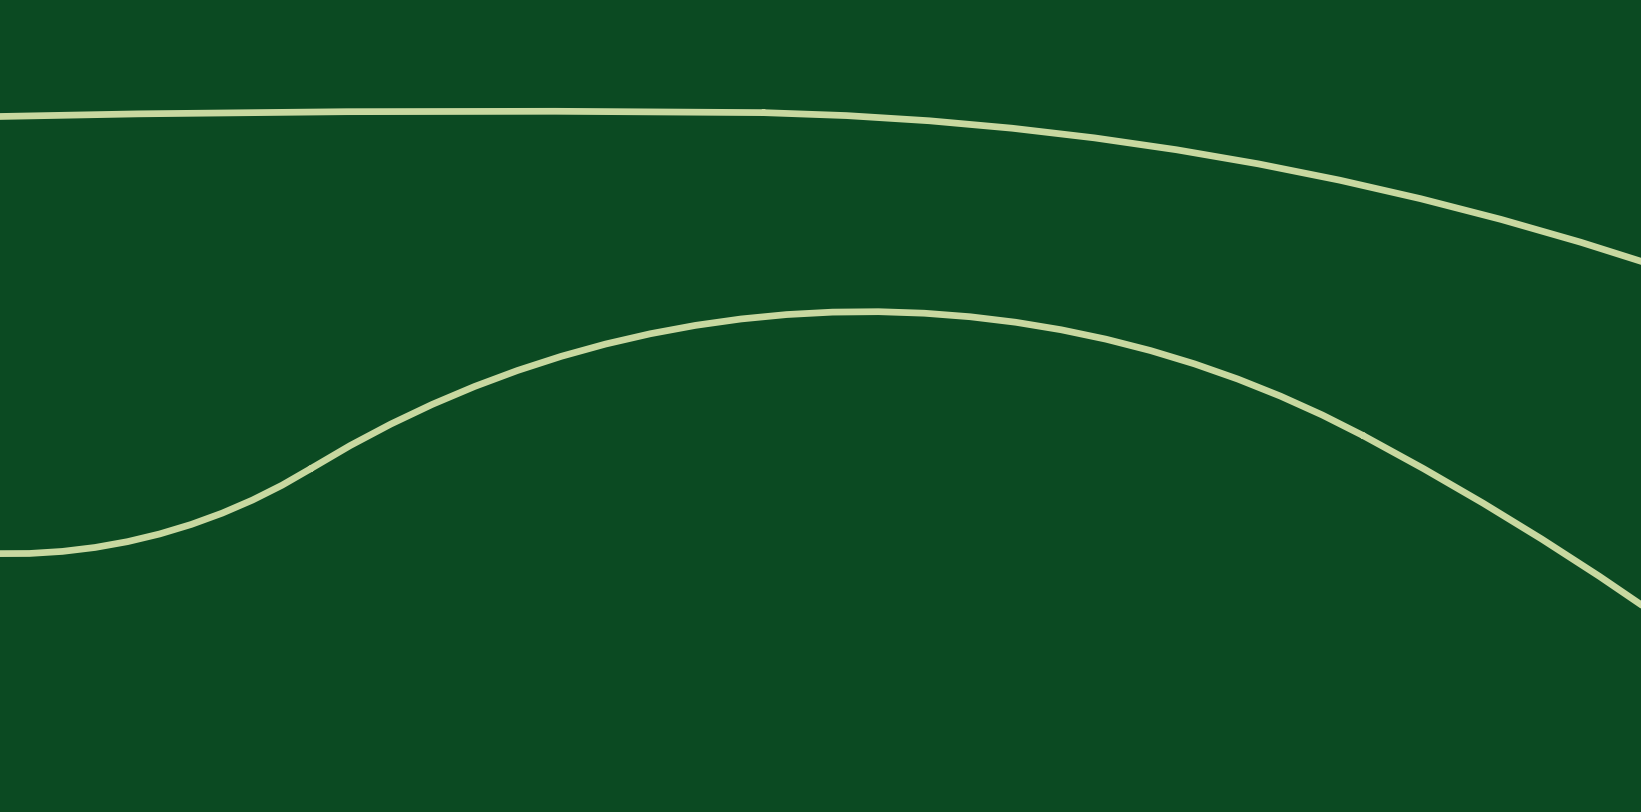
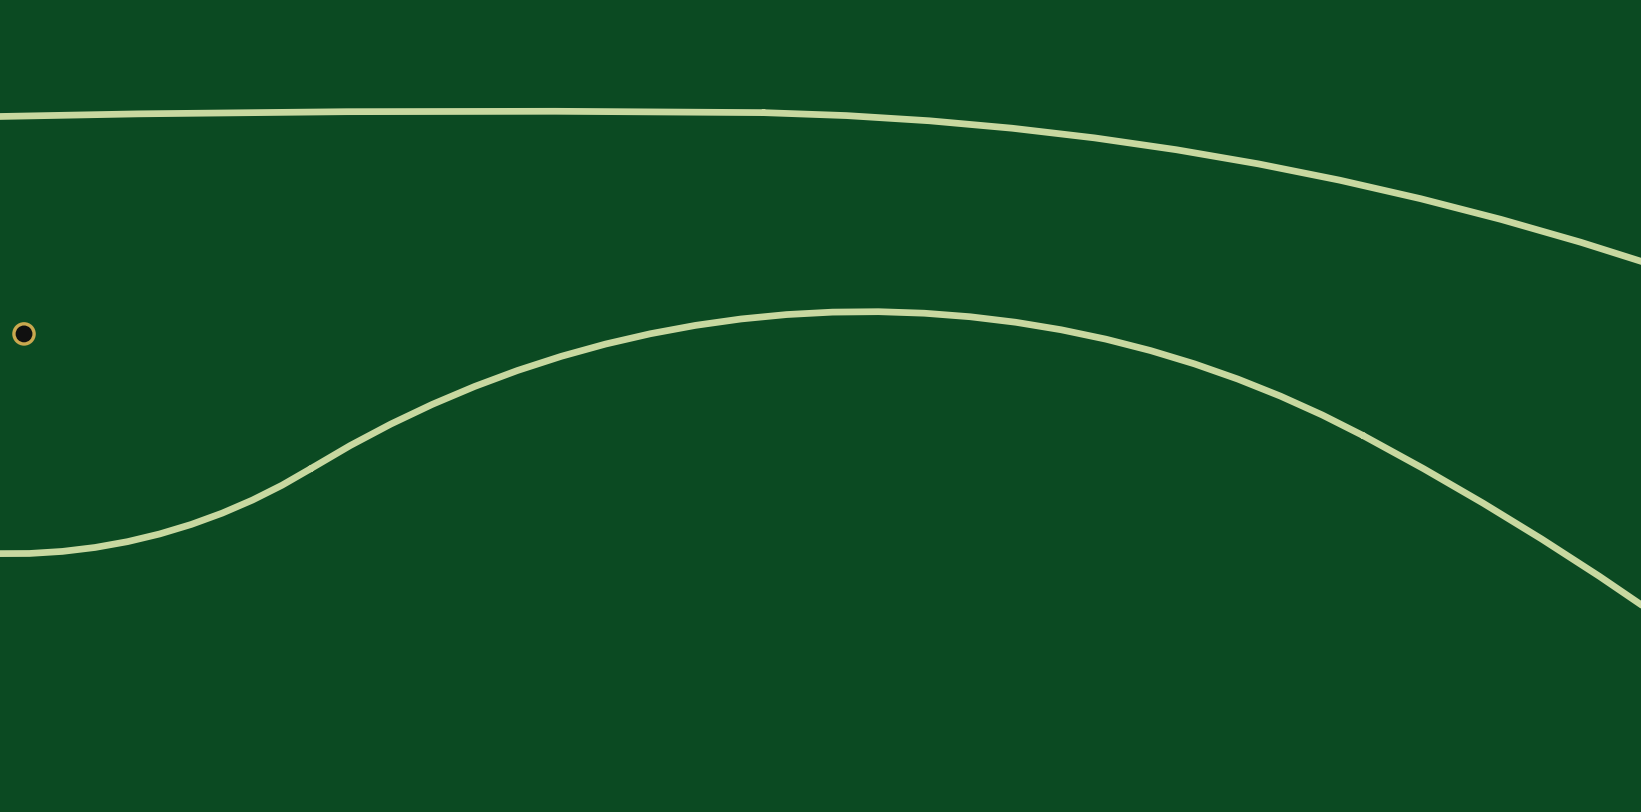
via: none -> (24, 333)

